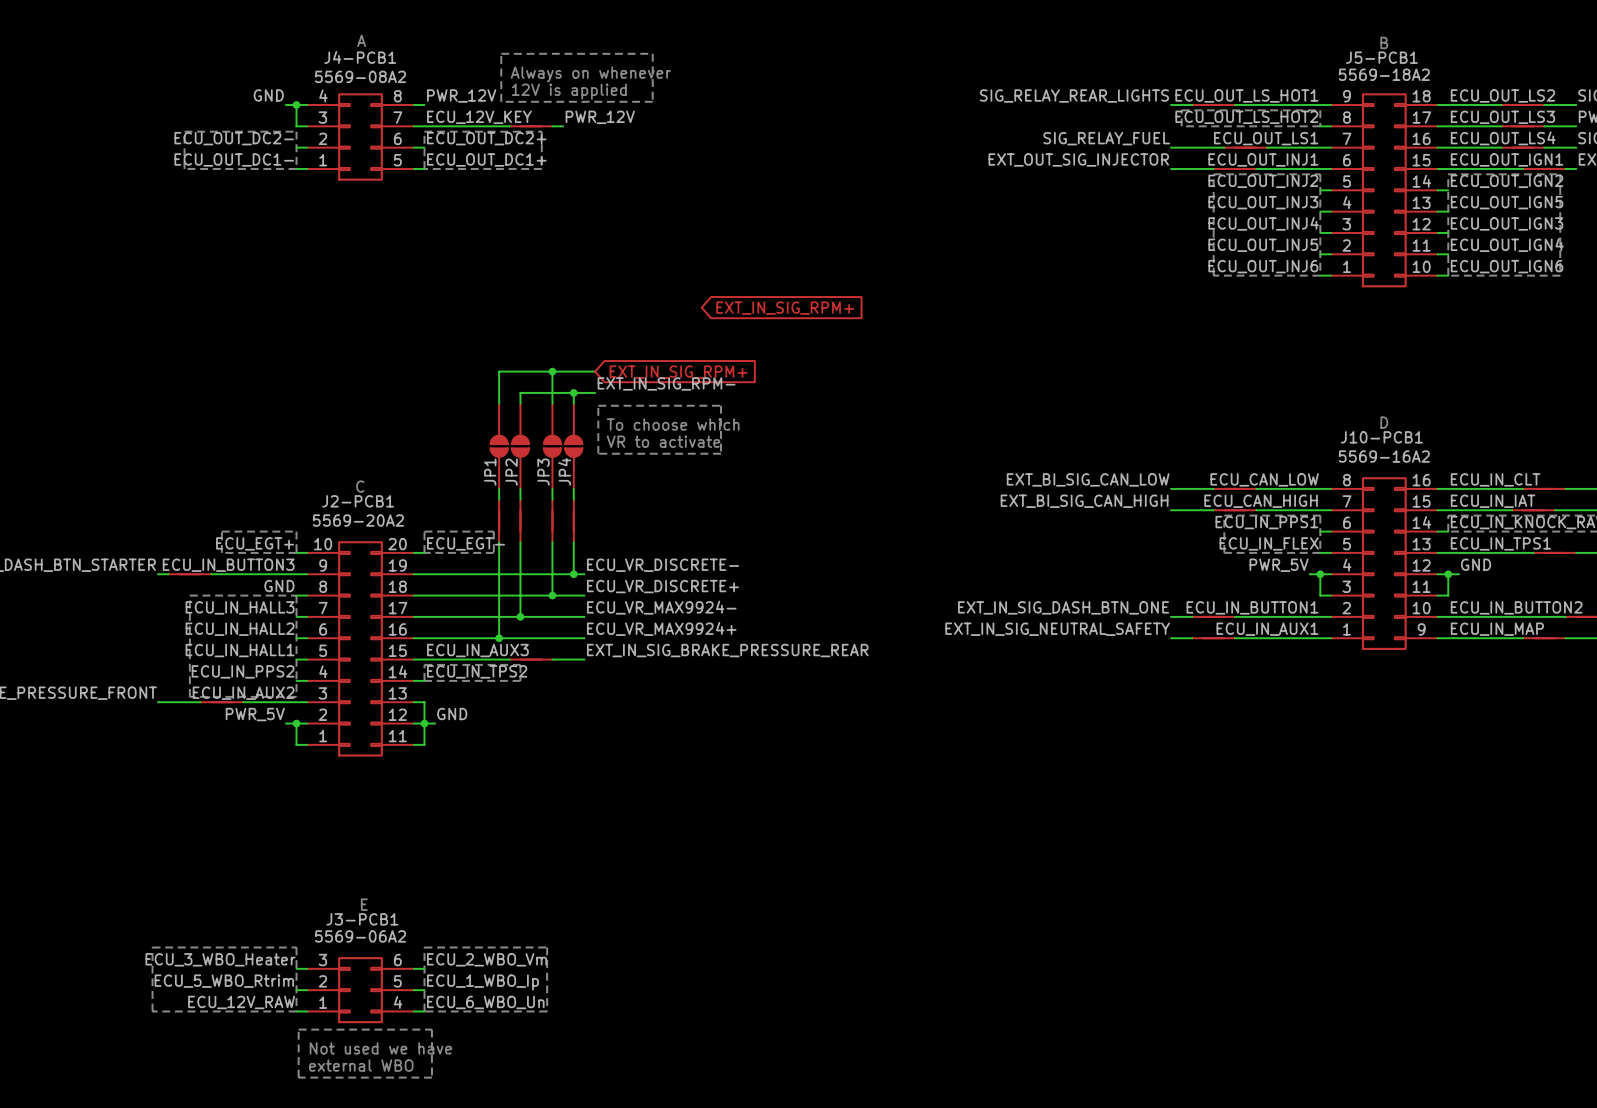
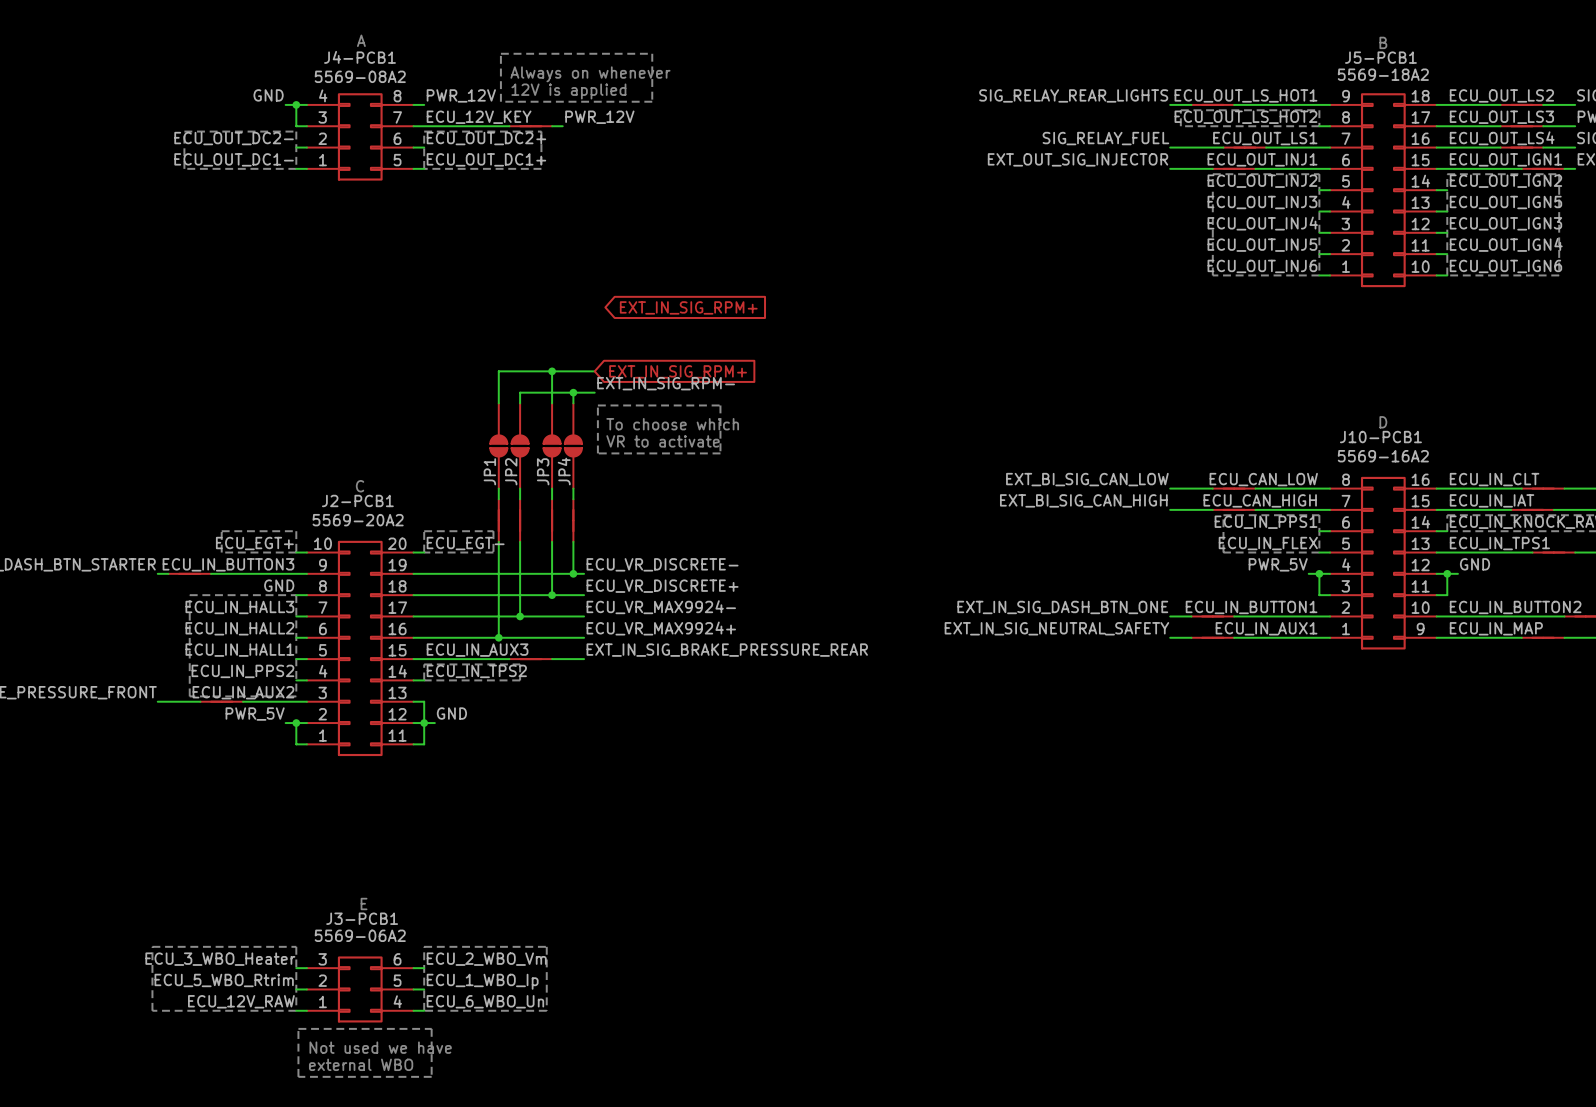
global label position: EXT_IN_SIG_RPM+ (785, 308) -> EXT_IN_SIG_RPM+ (688, 307)

